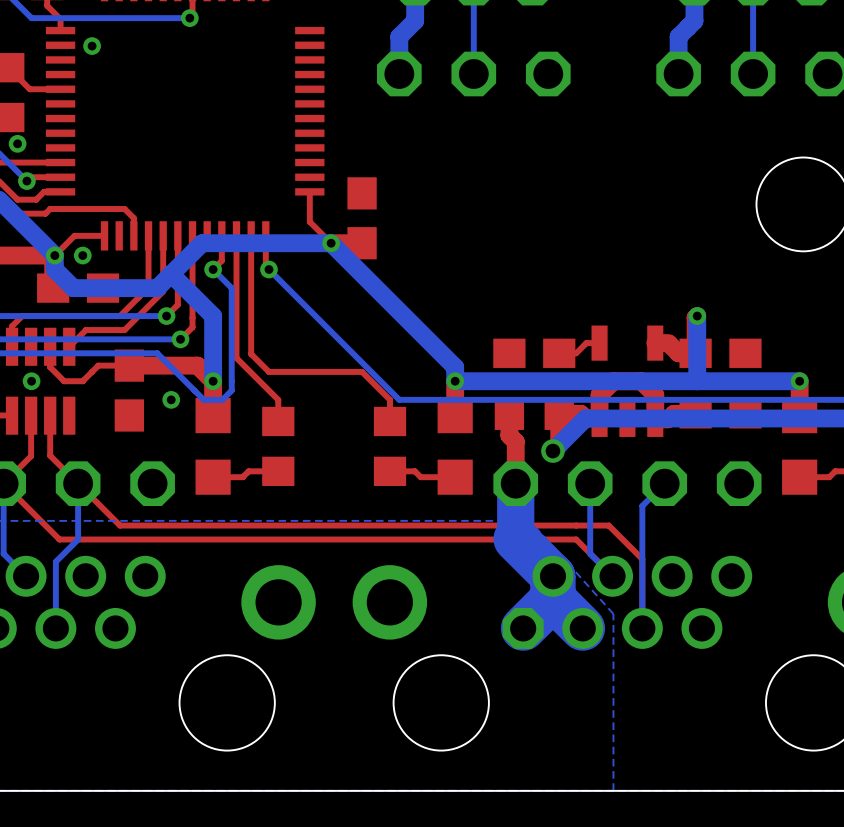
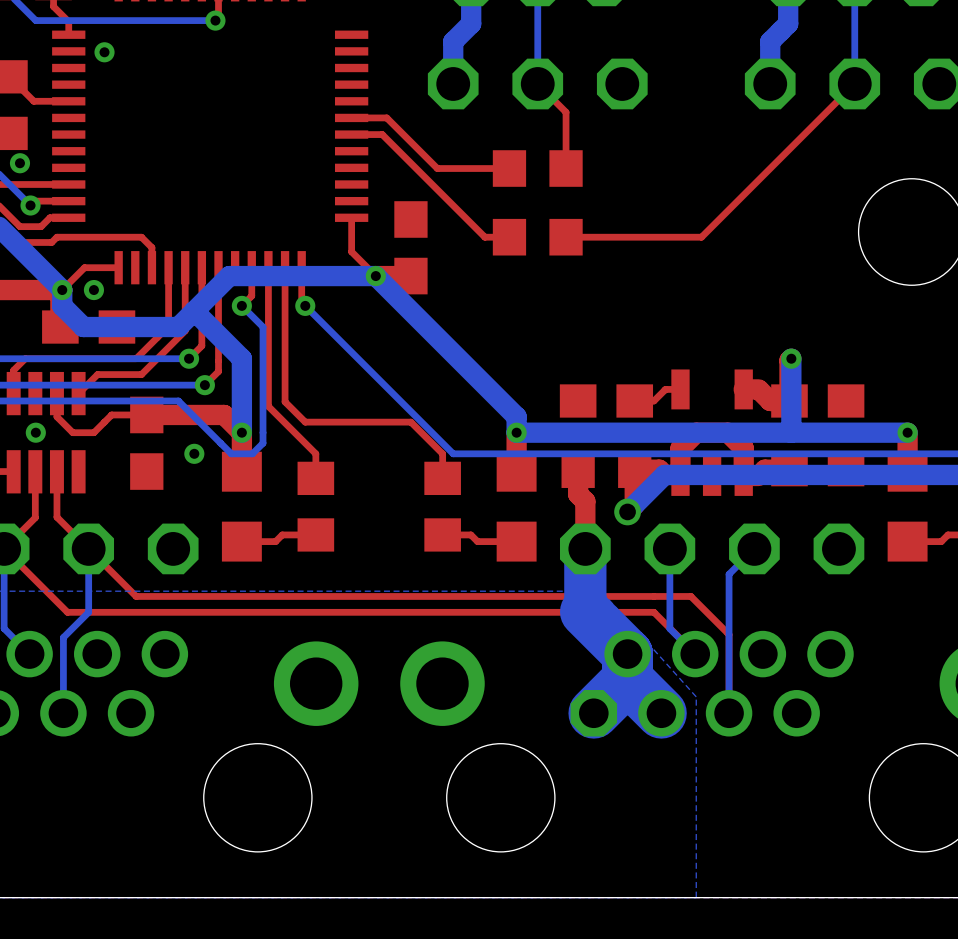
top track: none -> (537, 83) (566, 112) (566, 168)
top track: none -> (854, 83) (701, 237) (566, 237)
top track: none -> (351, 117) (386, 117) (437, 168) (509, 168)
top track: none -> (351, 134) (382, 134) (484, 237) (509, 237)
part: none -> (537, 168)
part: none -> (537, 237)

